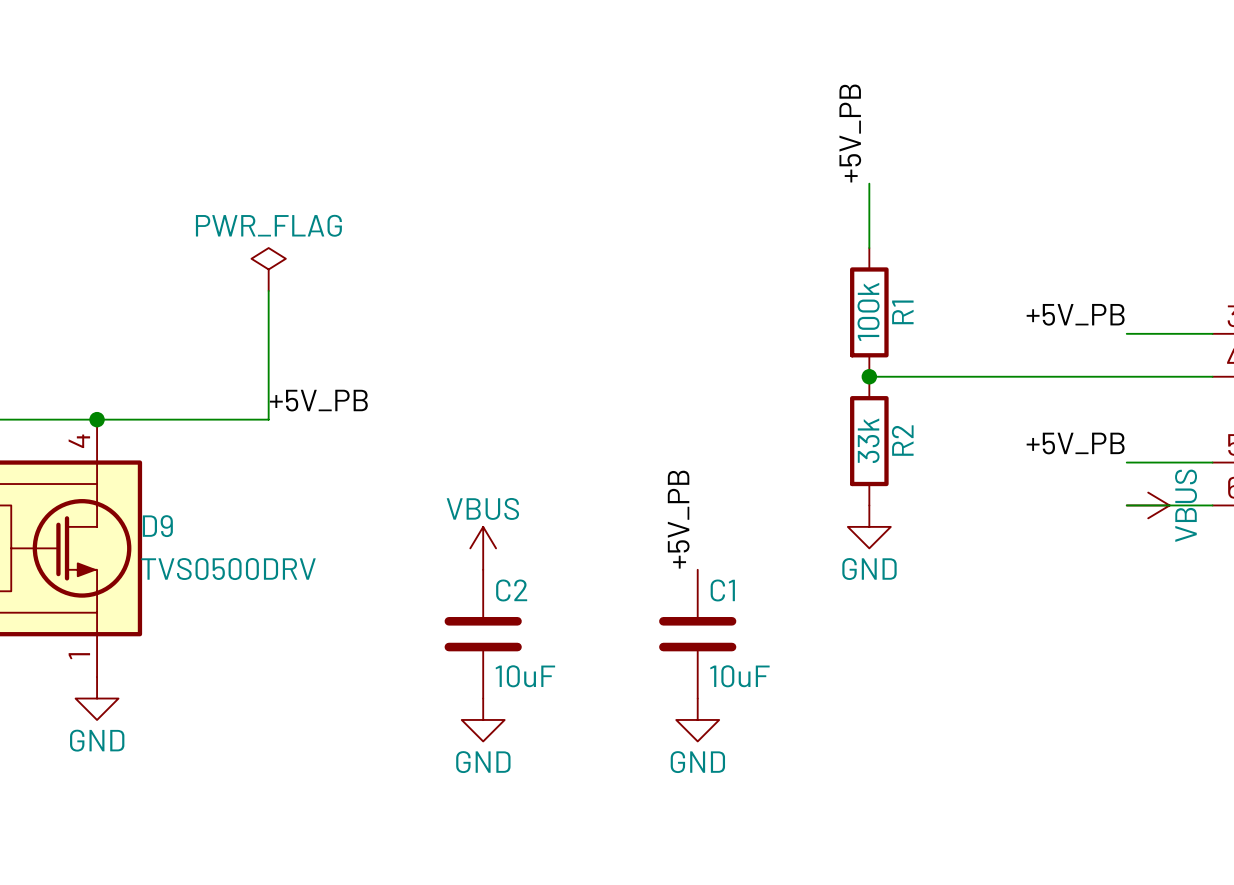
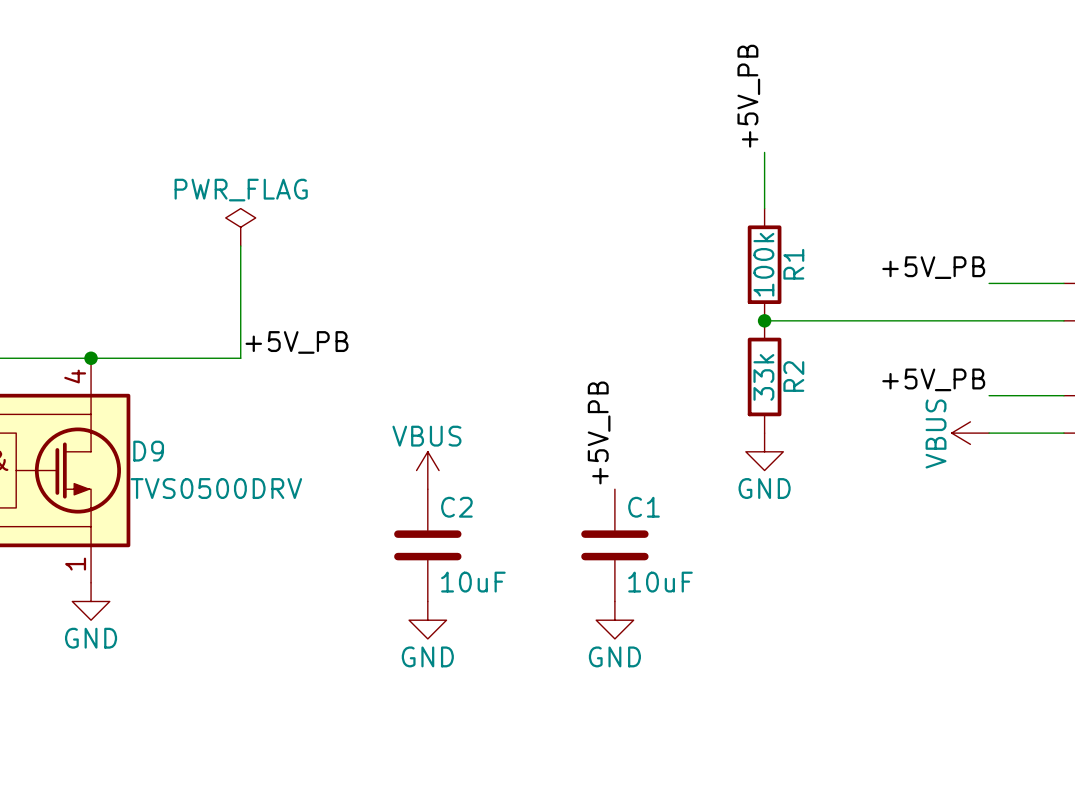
power symbol rotation: 0° (1148, 505) -> 180° (970, 433)
power symbol position: VBUS (1148, 505) -> VBUS (970, 433)

